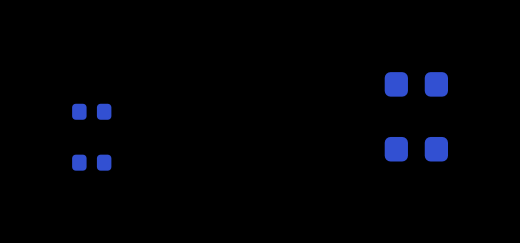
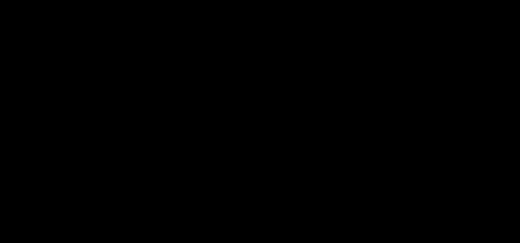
part: (416, 84) -> none
part: (91, 111) -> none
part: (416, 149) -> none
part: (91, 162) -> none

